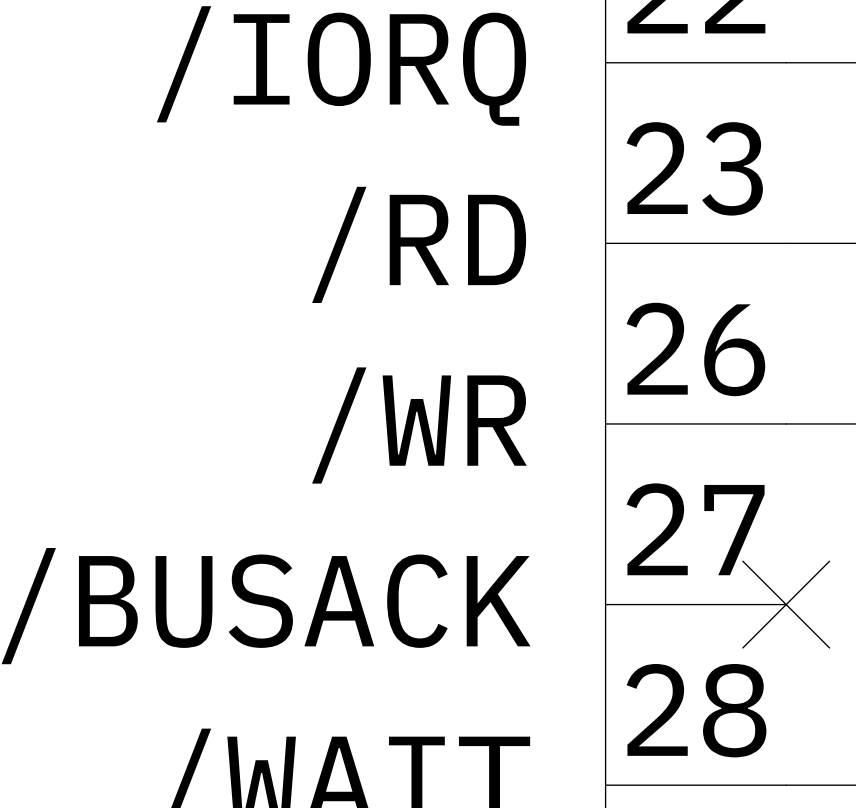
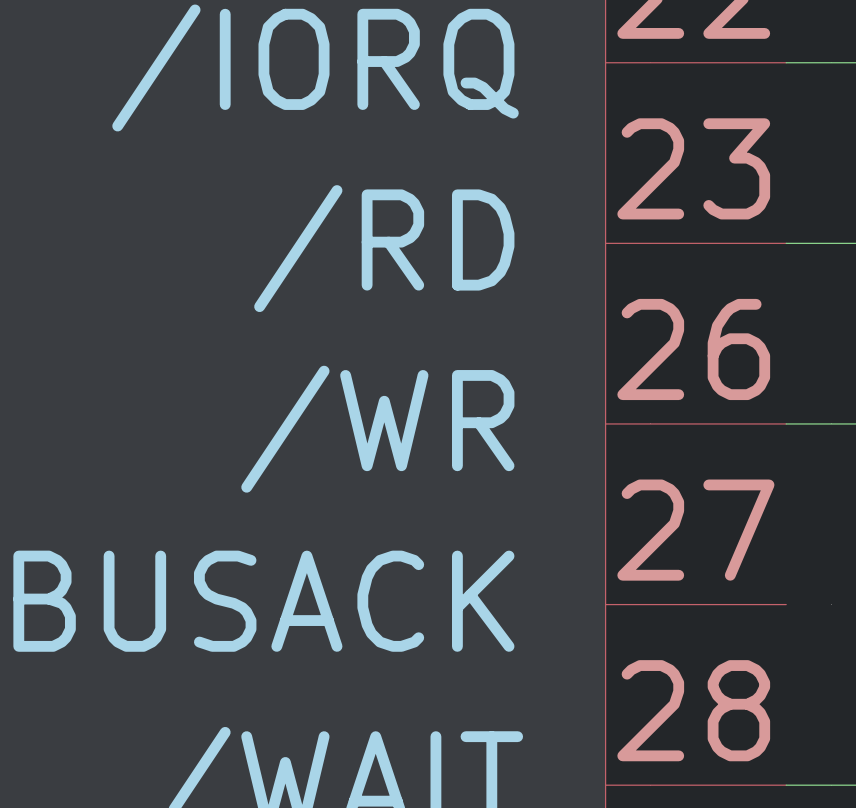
no-connect mark: (786, 604) -> none

